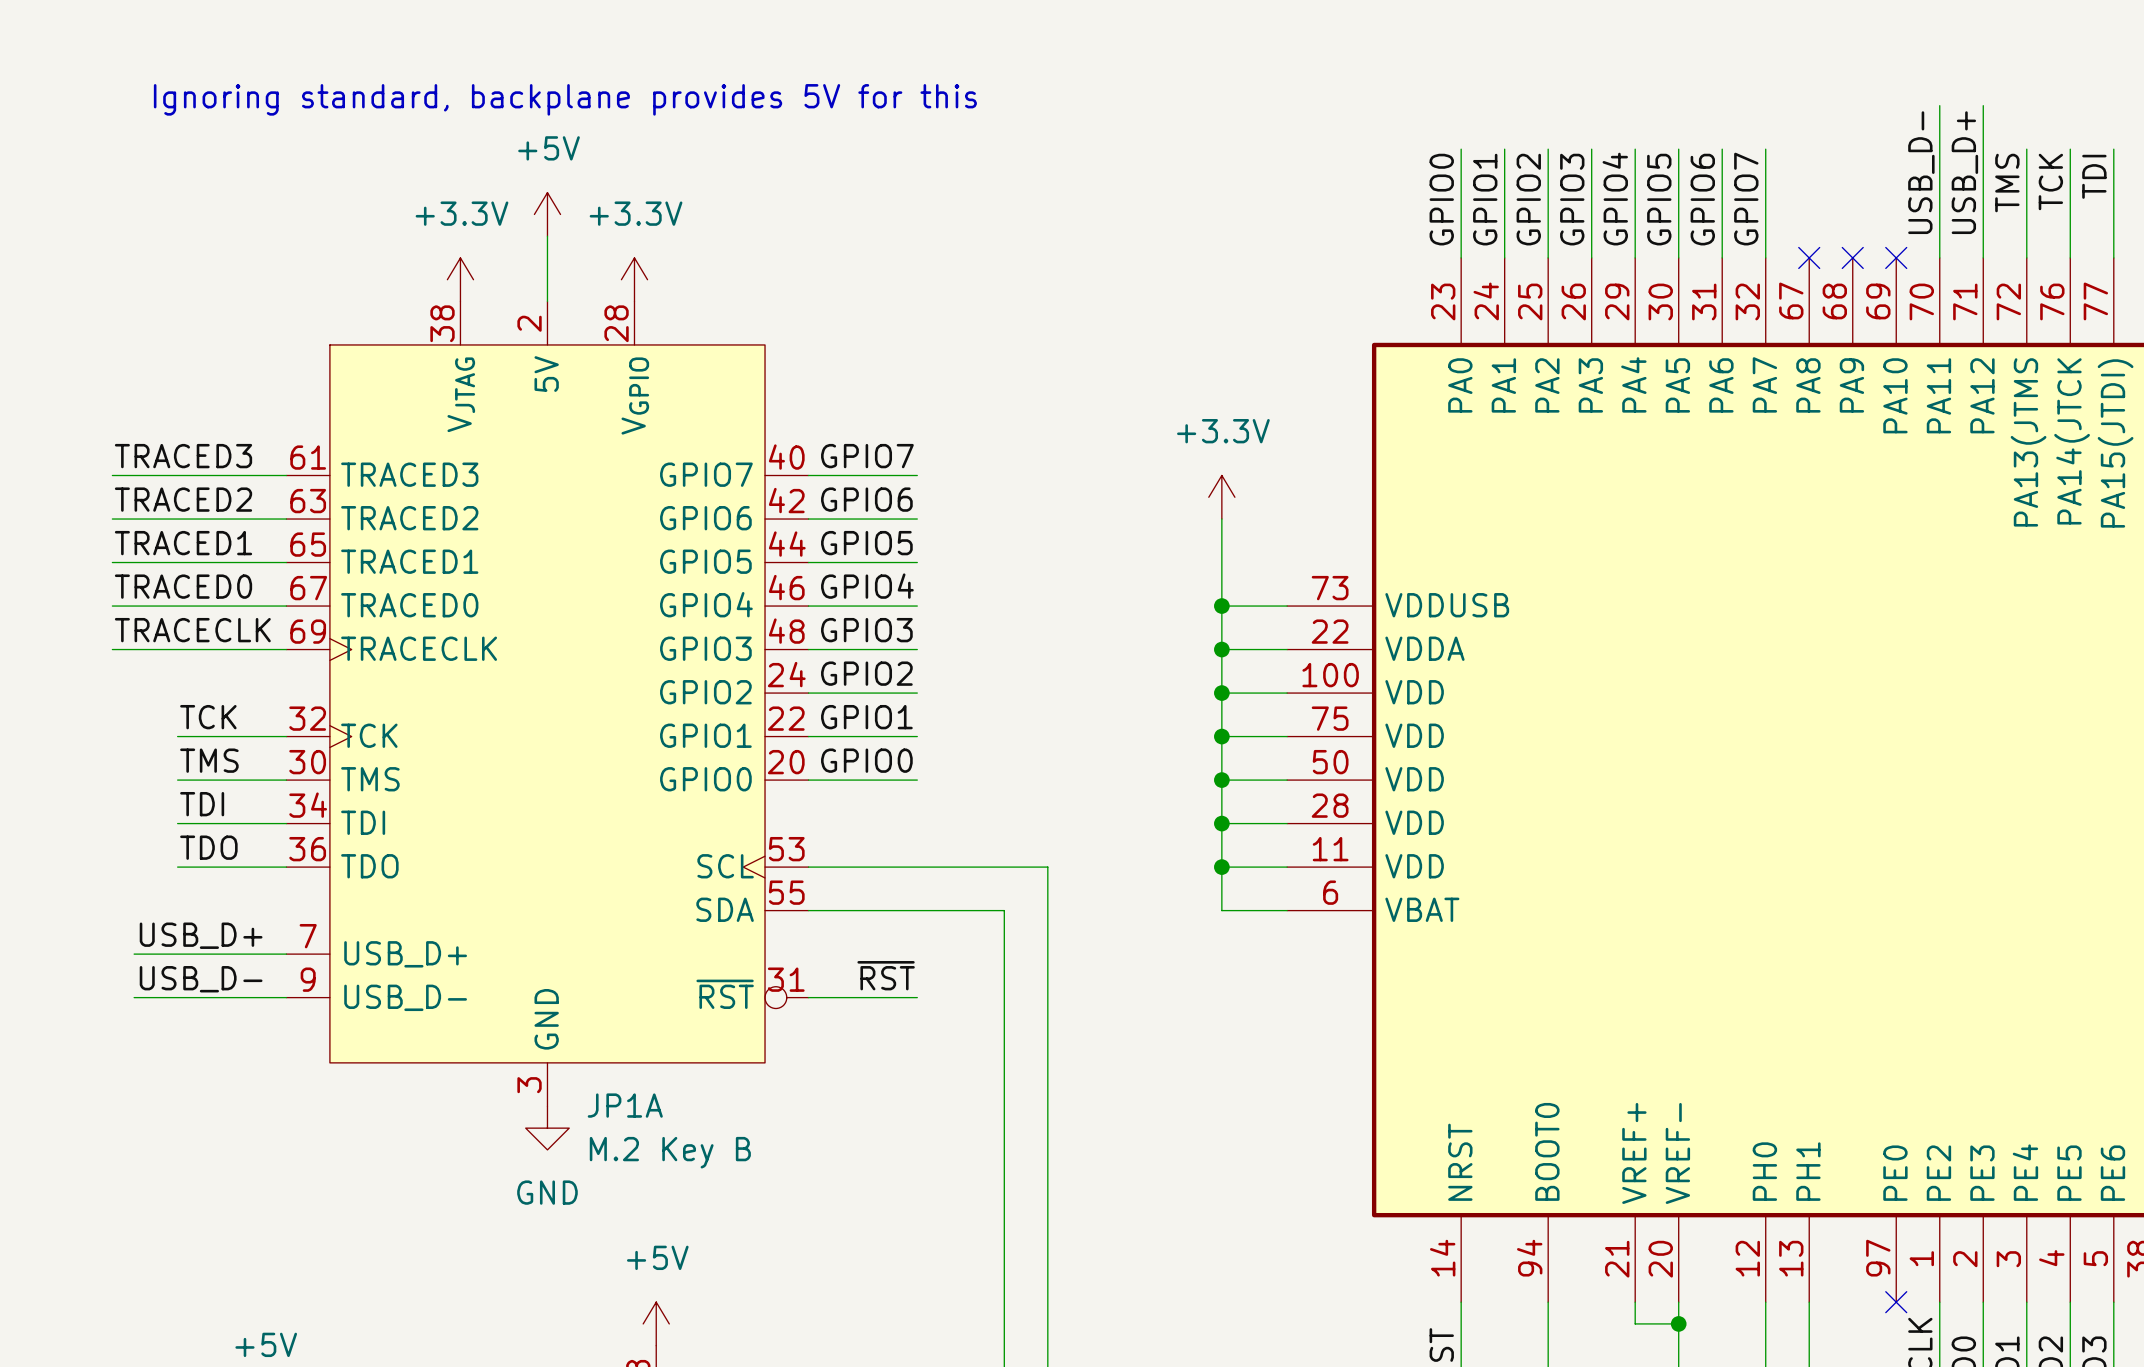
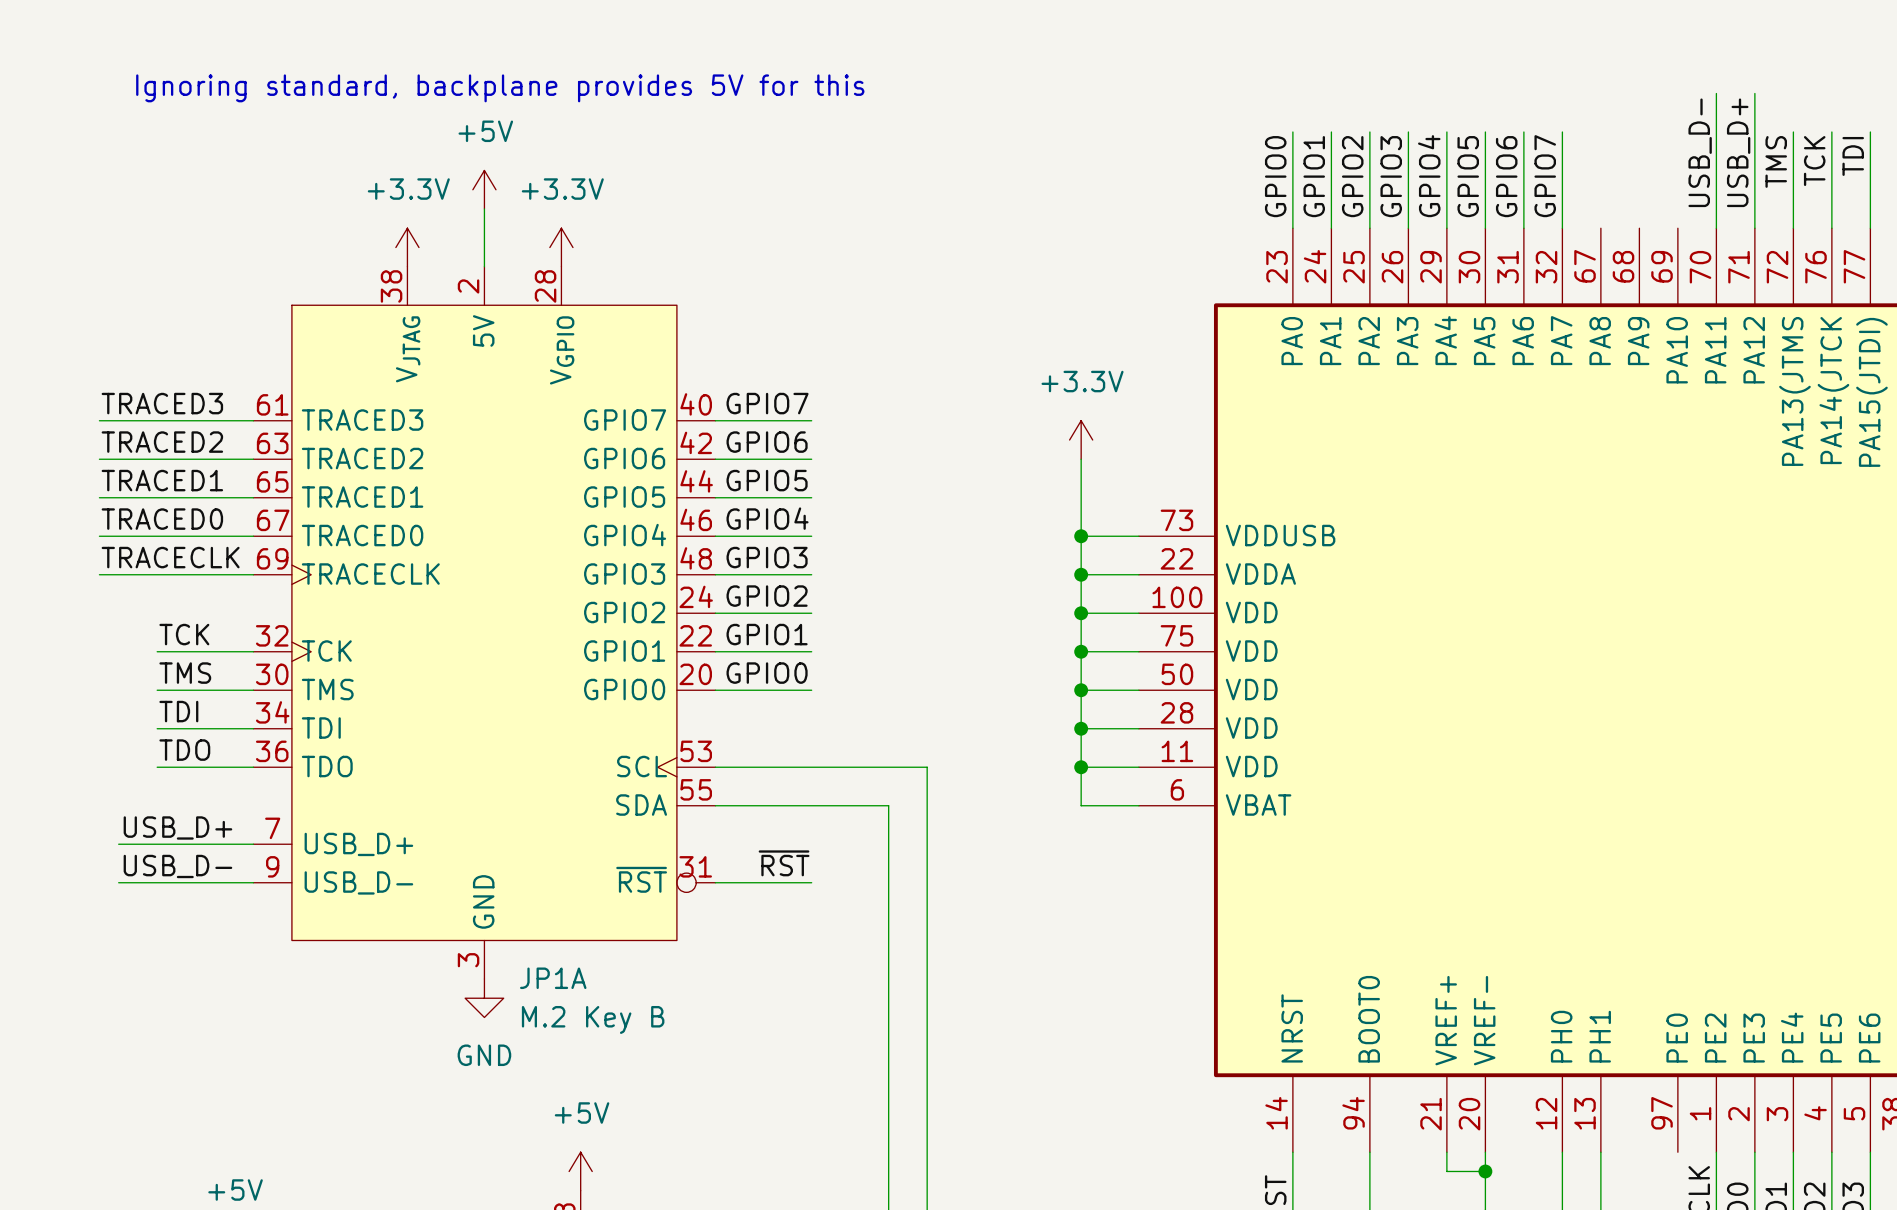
no-connect mark: (1809, 257) -> none
no-connect mark: (1852, 257) -> none
no-connect mark: (1896, 257) -> none
no-connect mark: (1896, 1302) -> none

